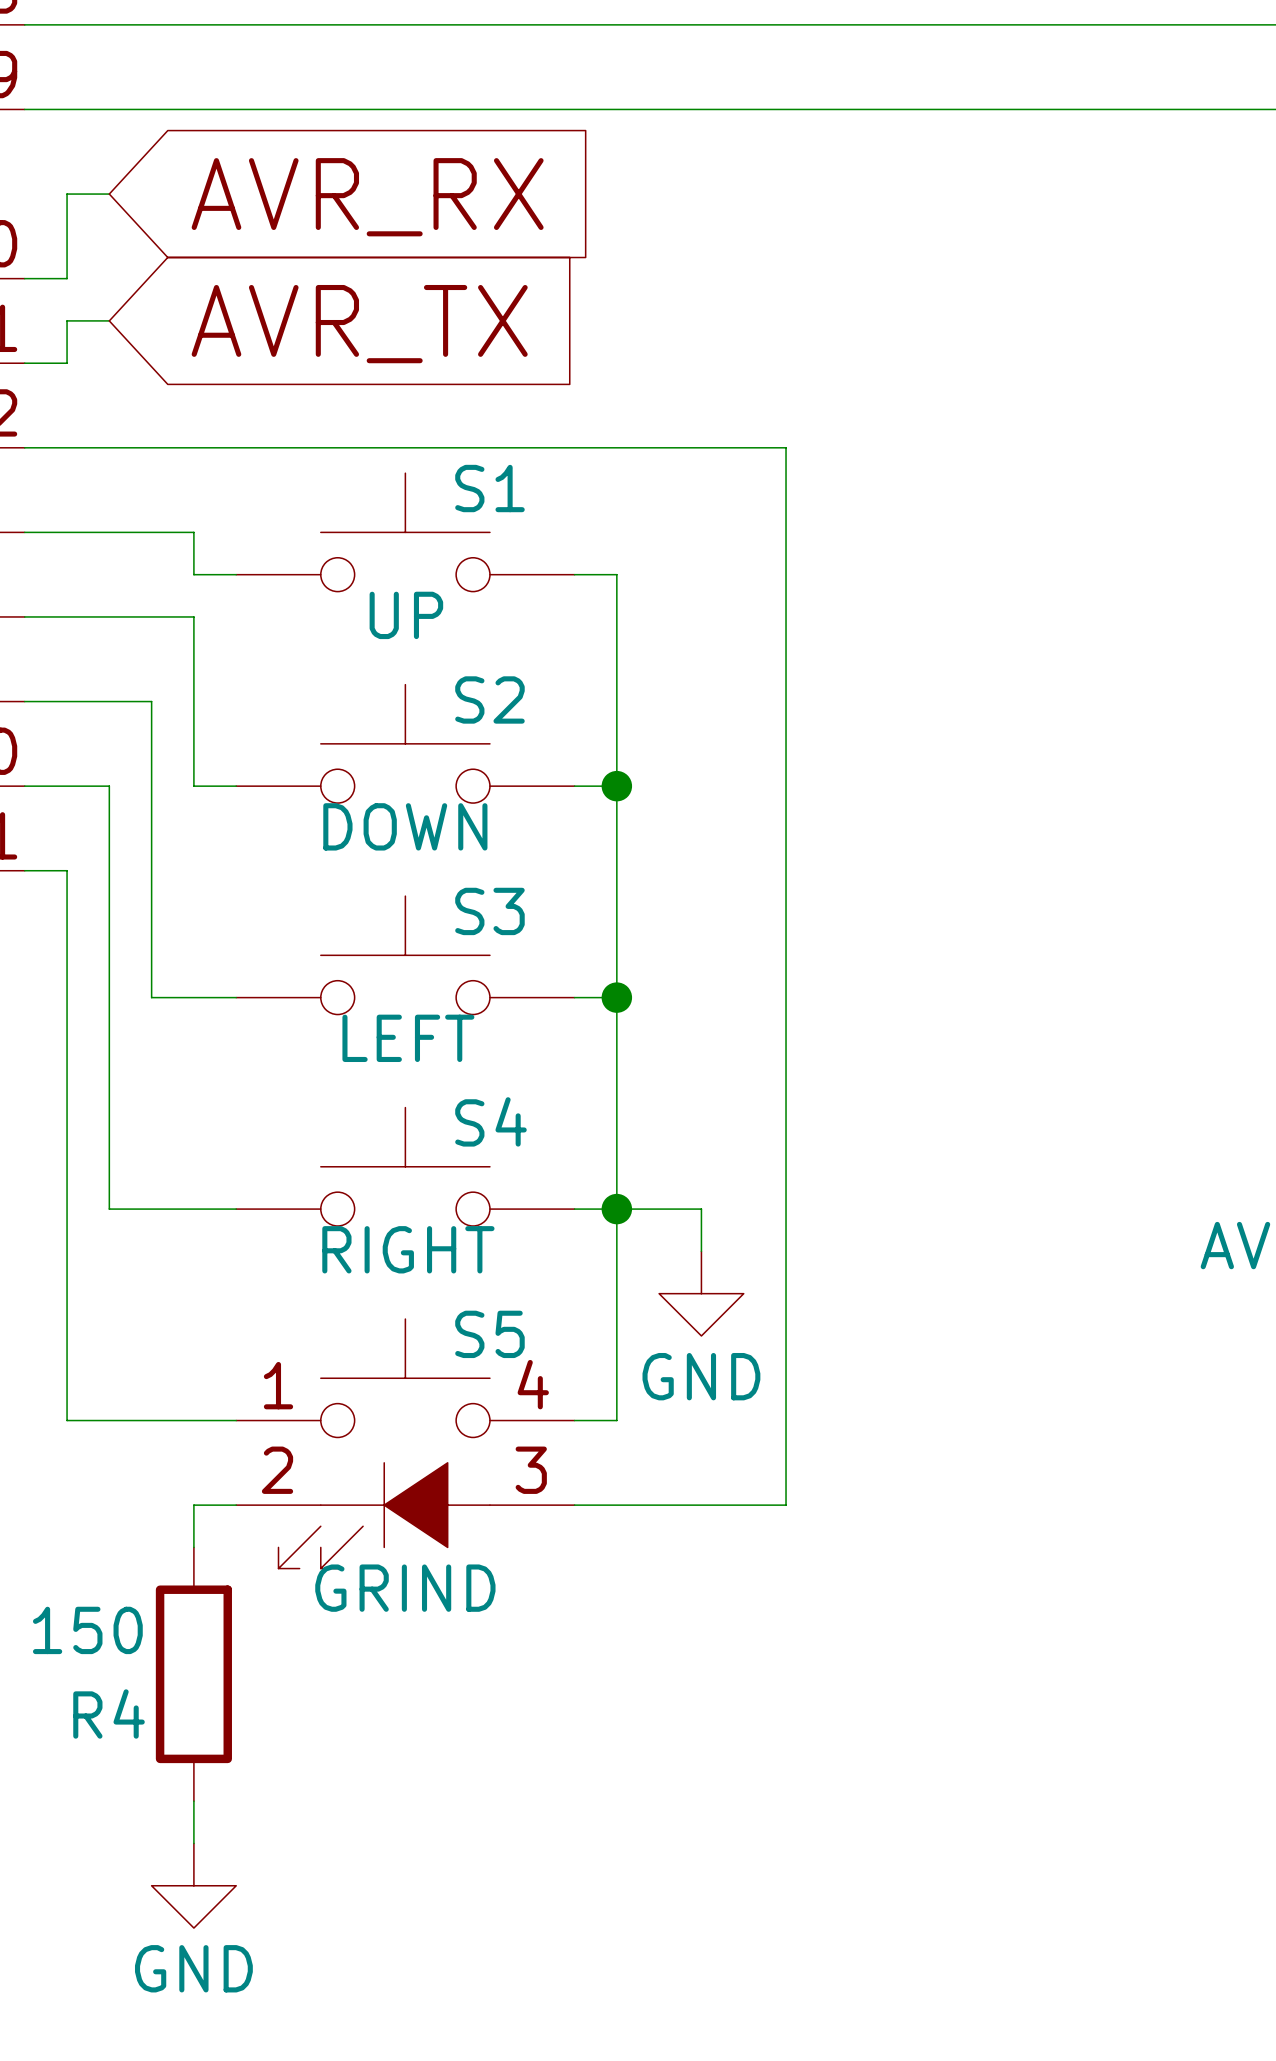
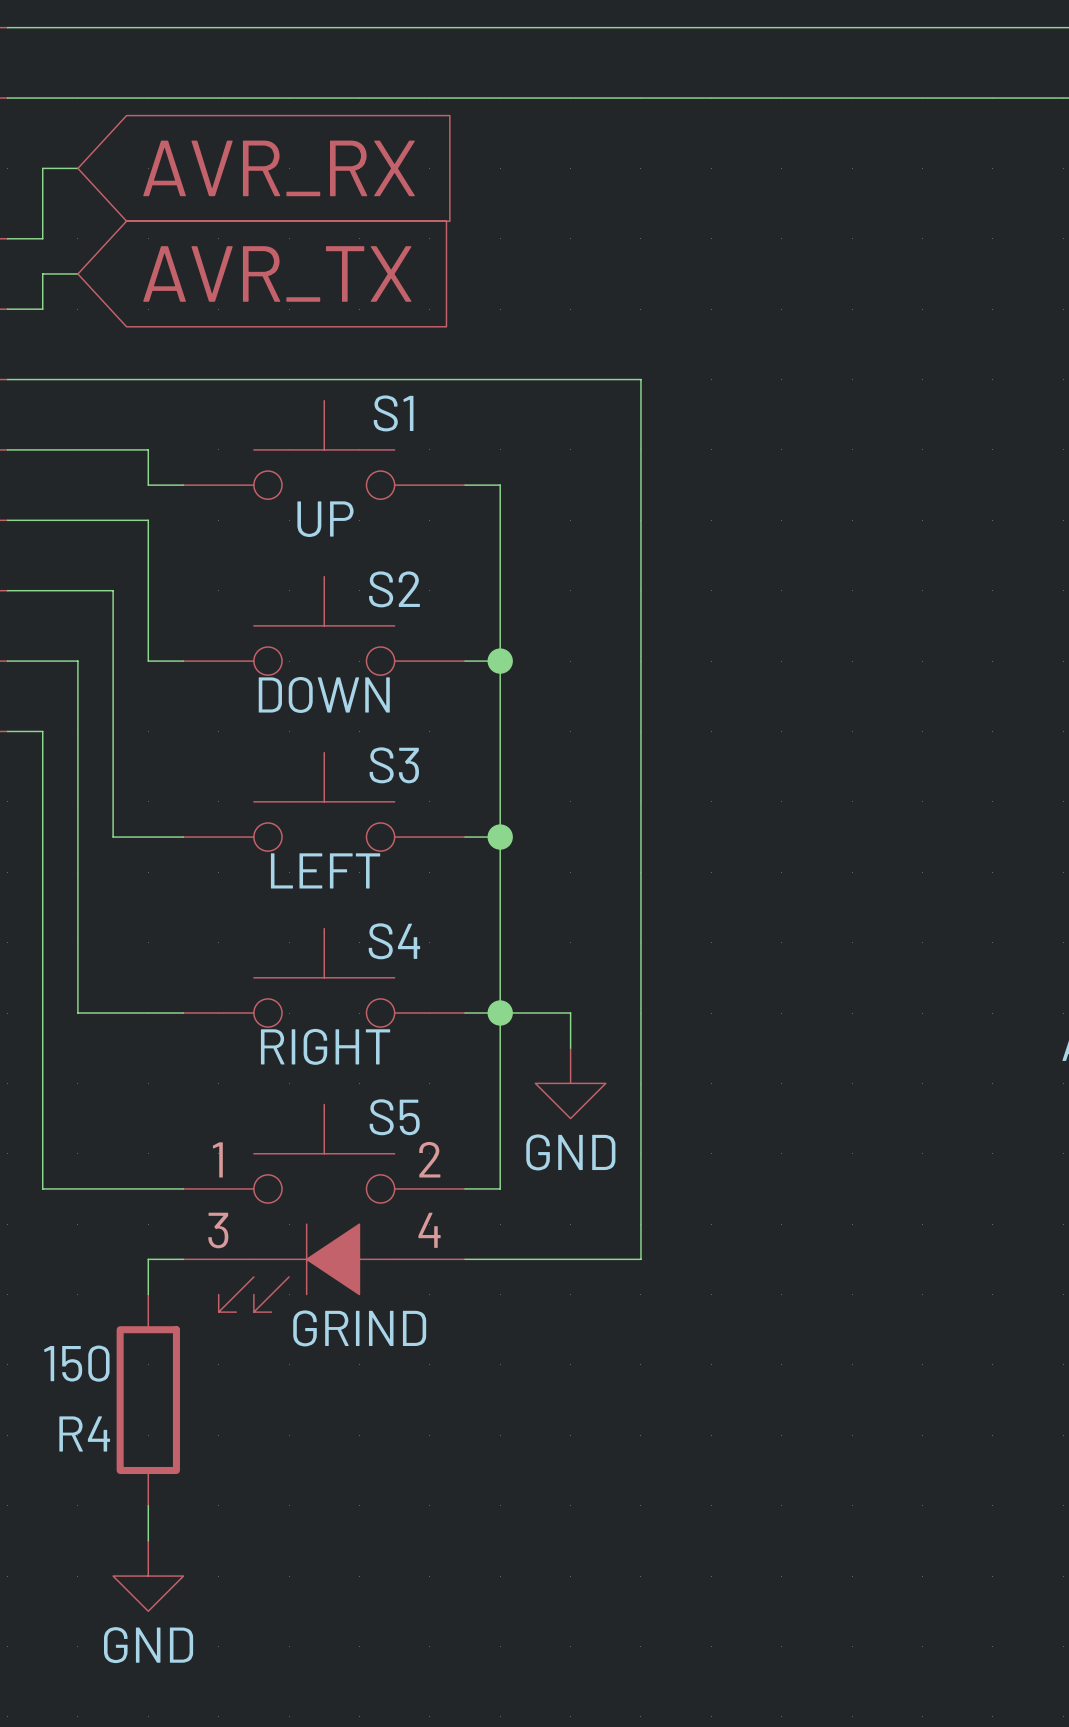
S5 pin number: 4 (533, 1384) -> 2 (429, 1159)
S5 pin number: 2 (277, 1470) -> 3 (218, 1230)
S5 pin number: 3 (531, 1470) -> 4 (429, 1230)
S5 value position: GRIND (405, 1588) -> GRIND (359, 1328)

